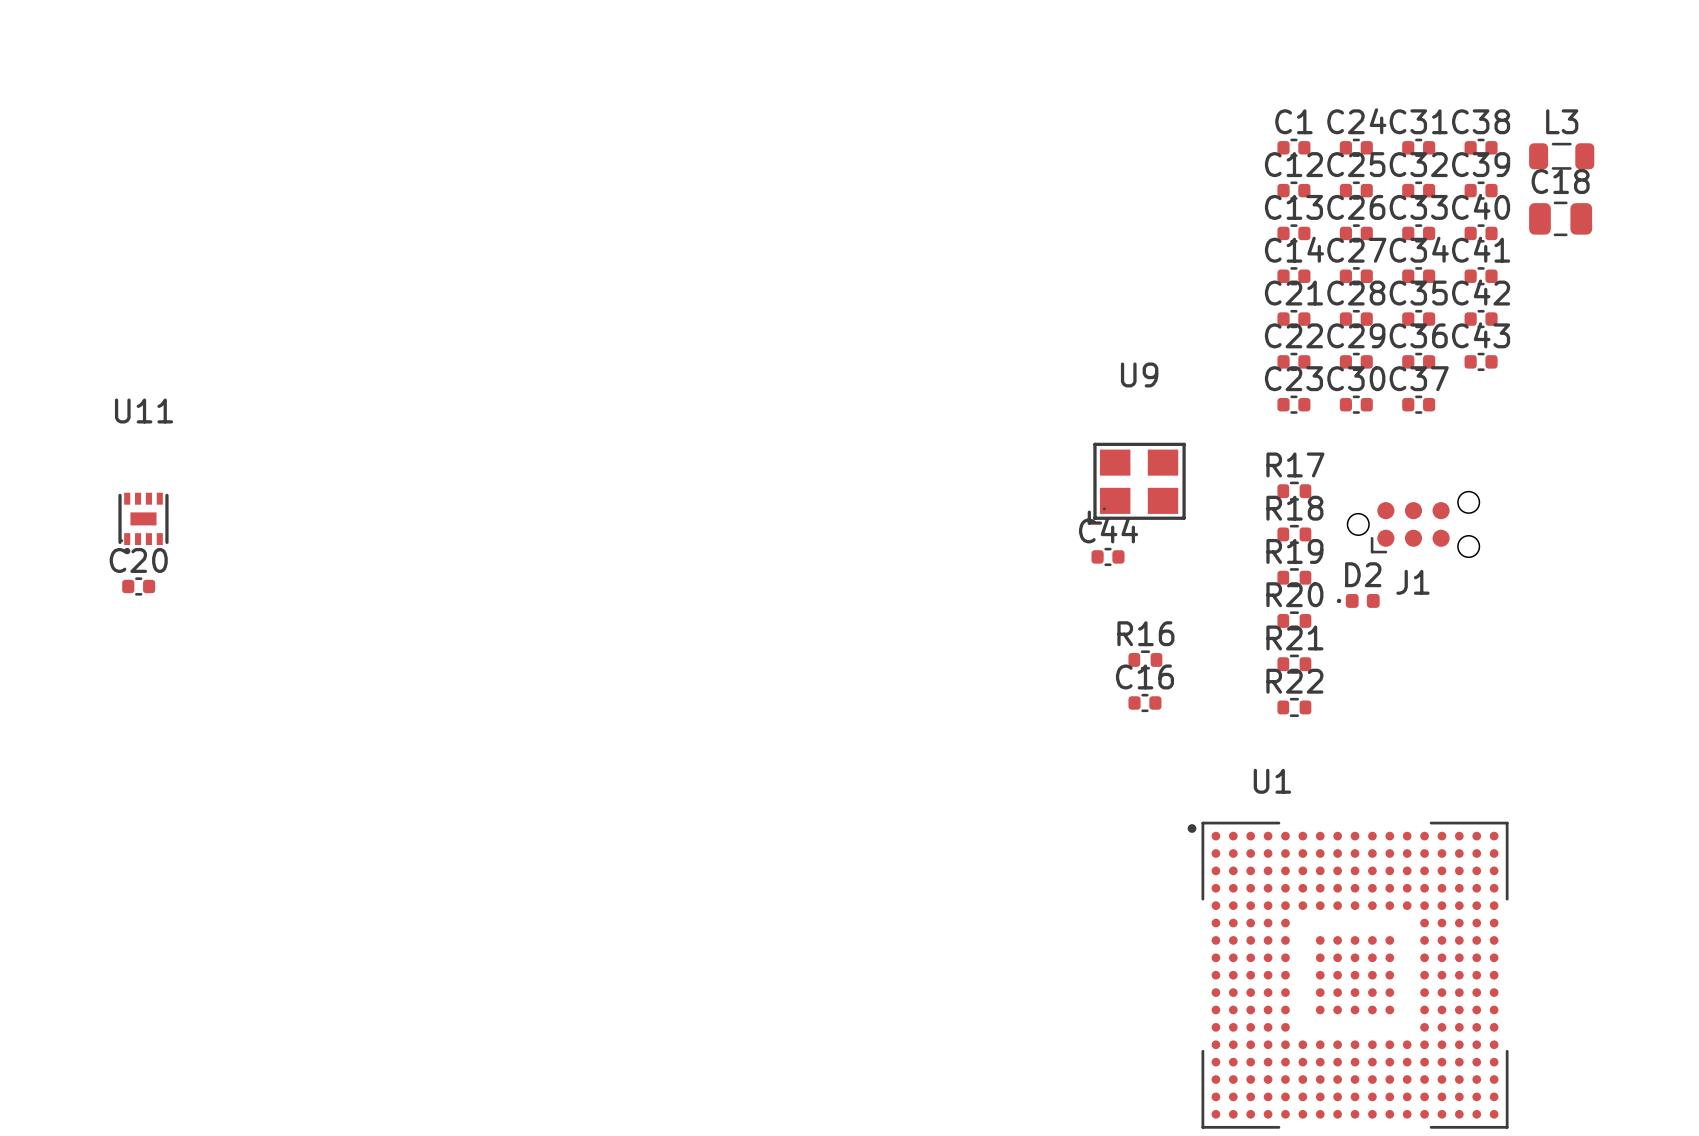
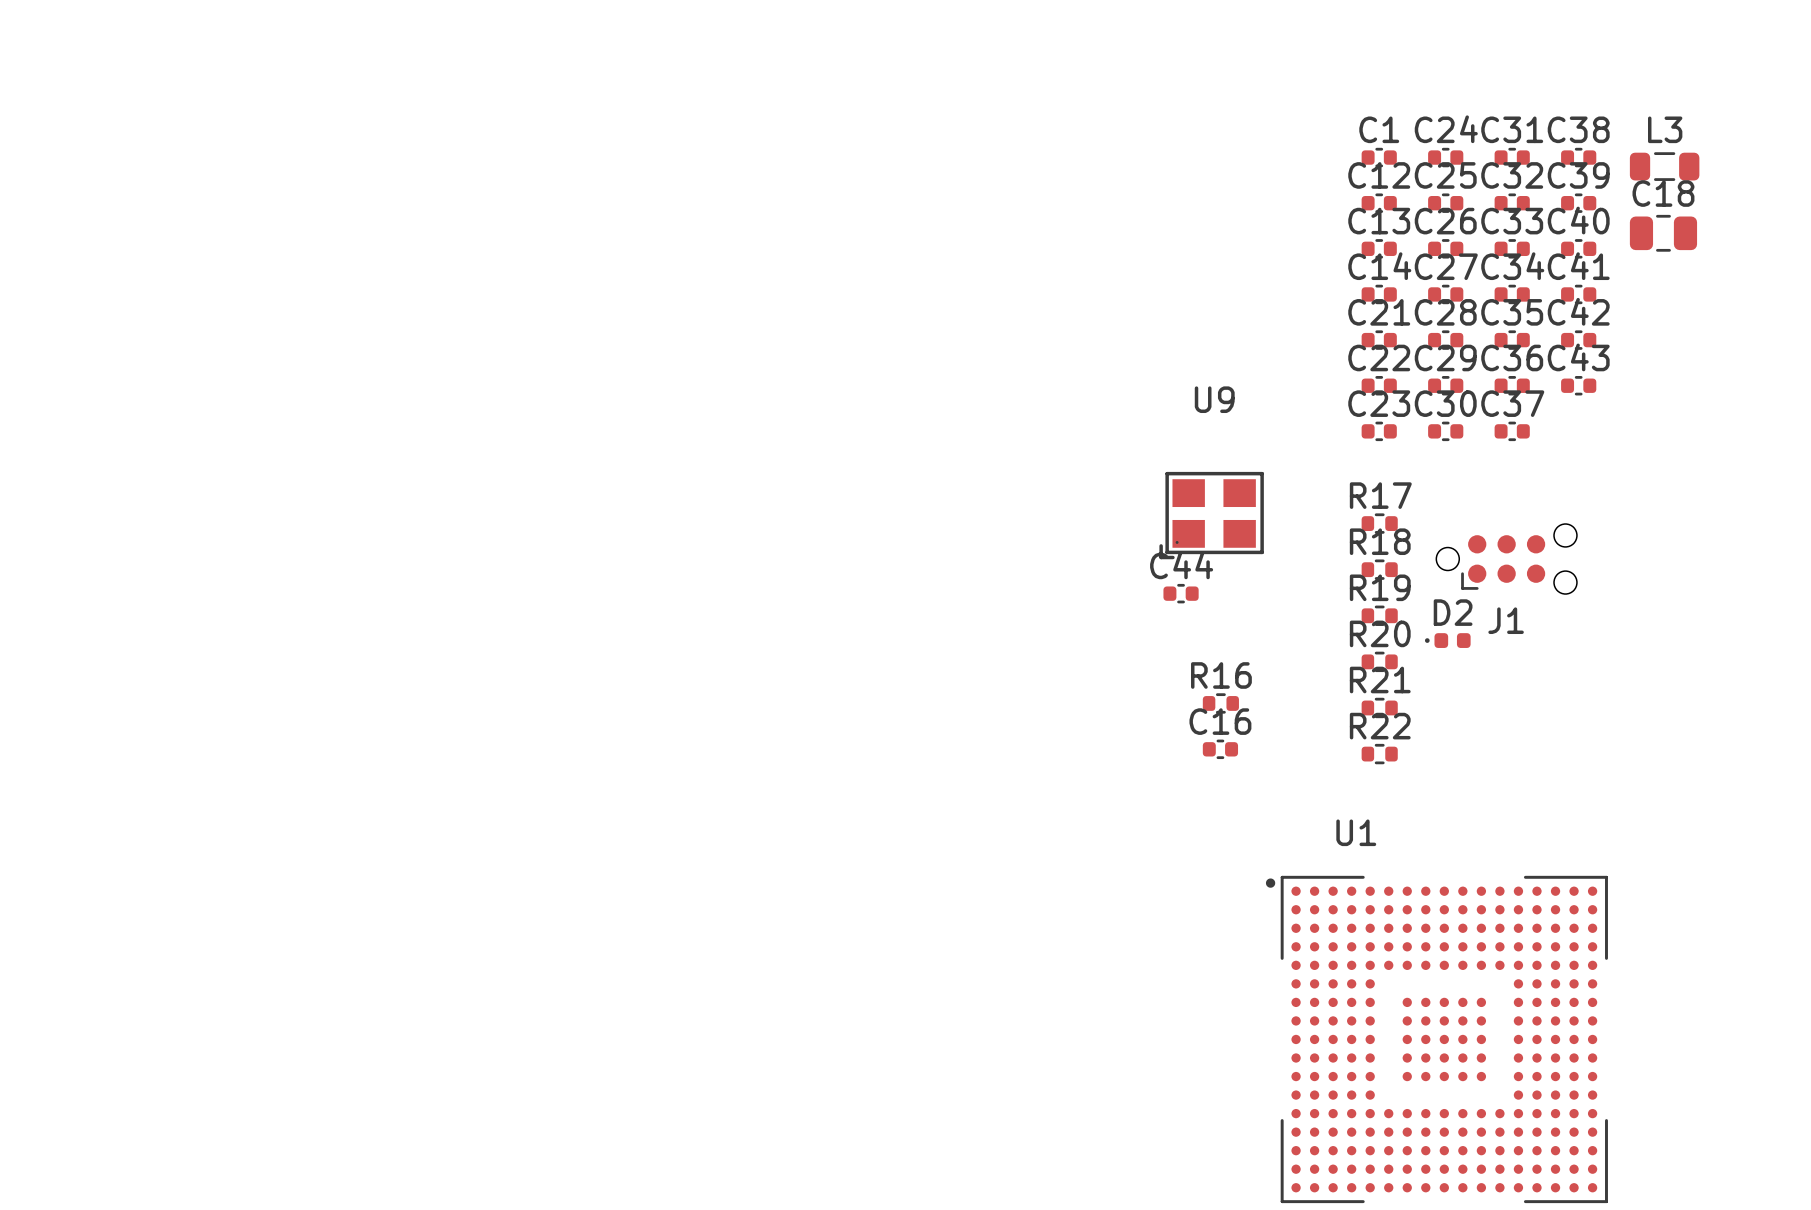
U11: (143, 523) -> none
C20: (138, 586) -> none

